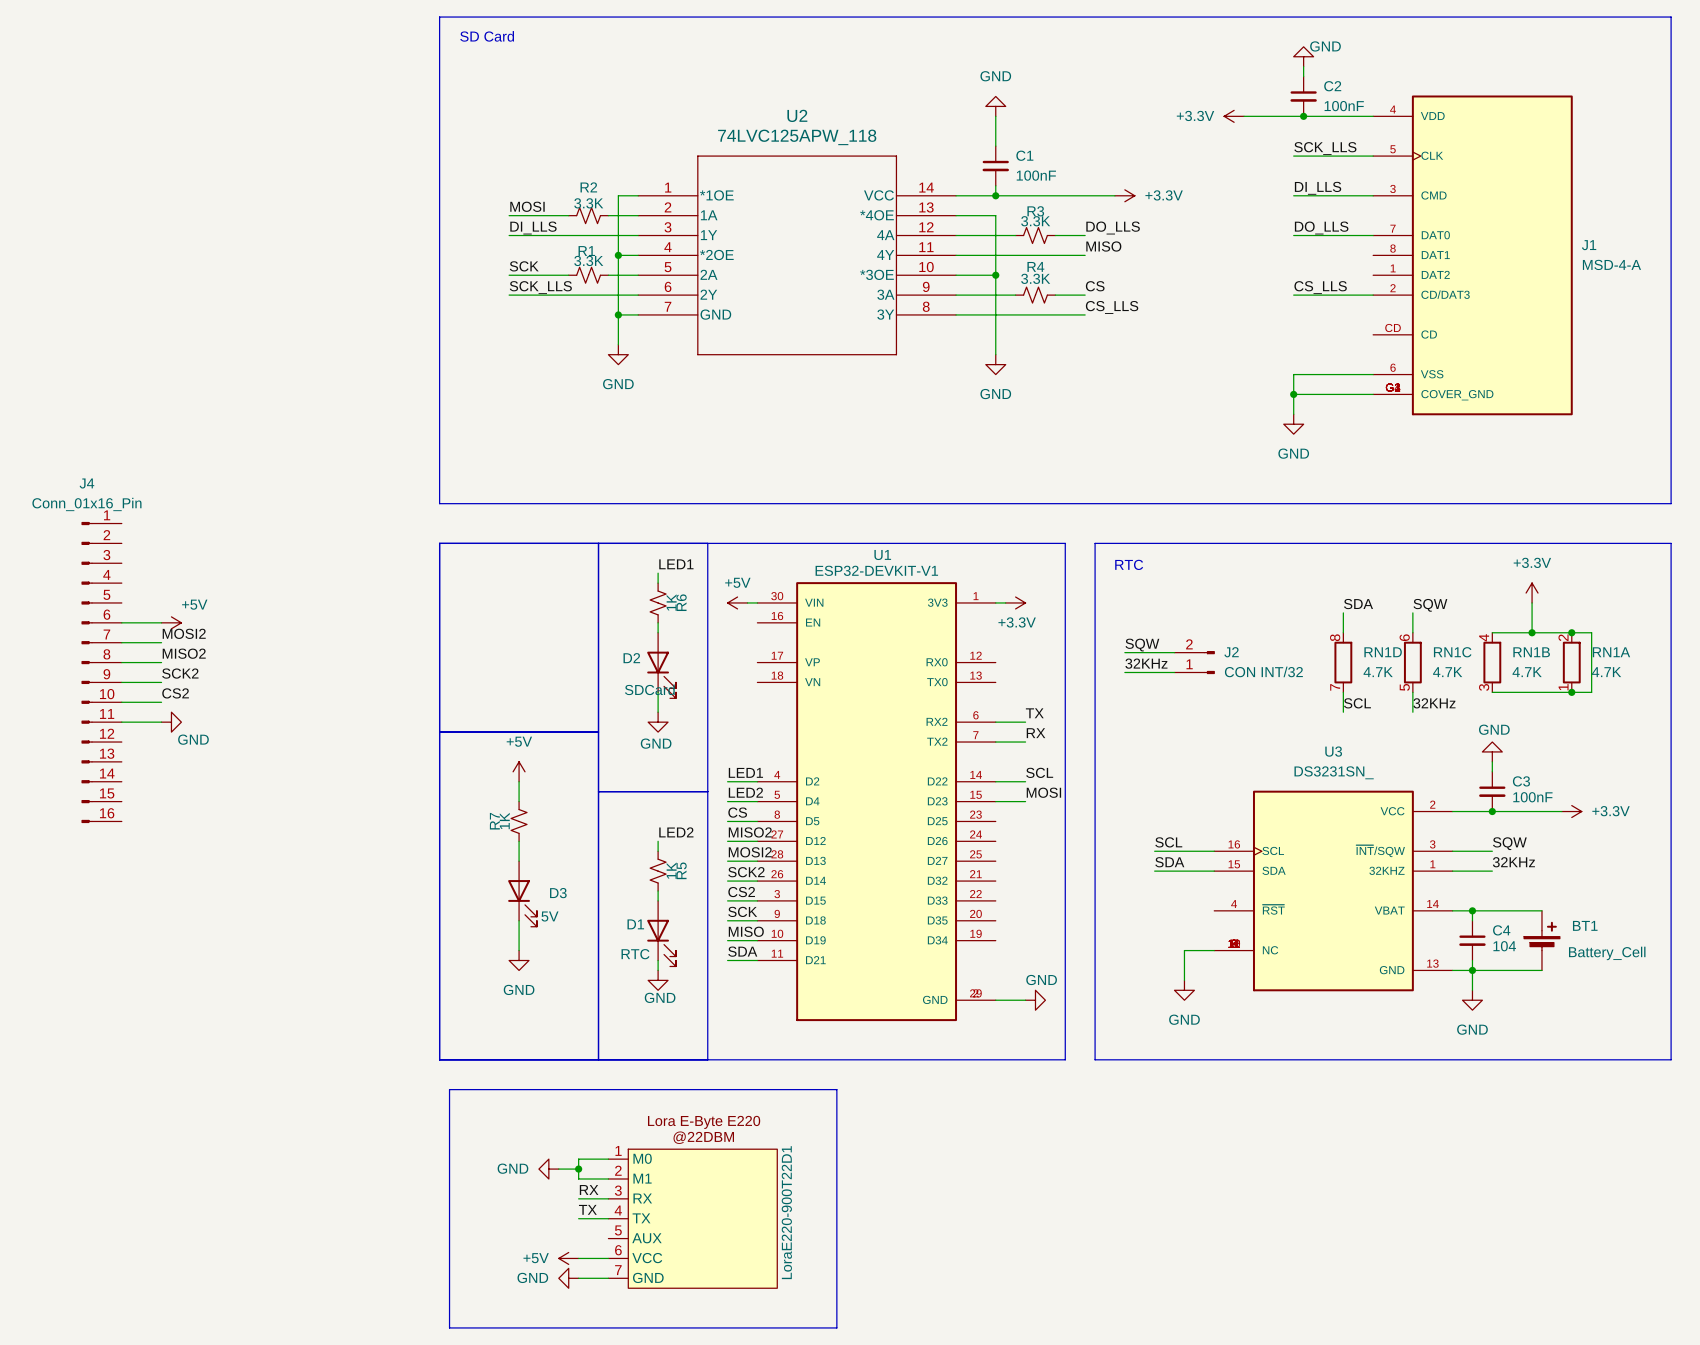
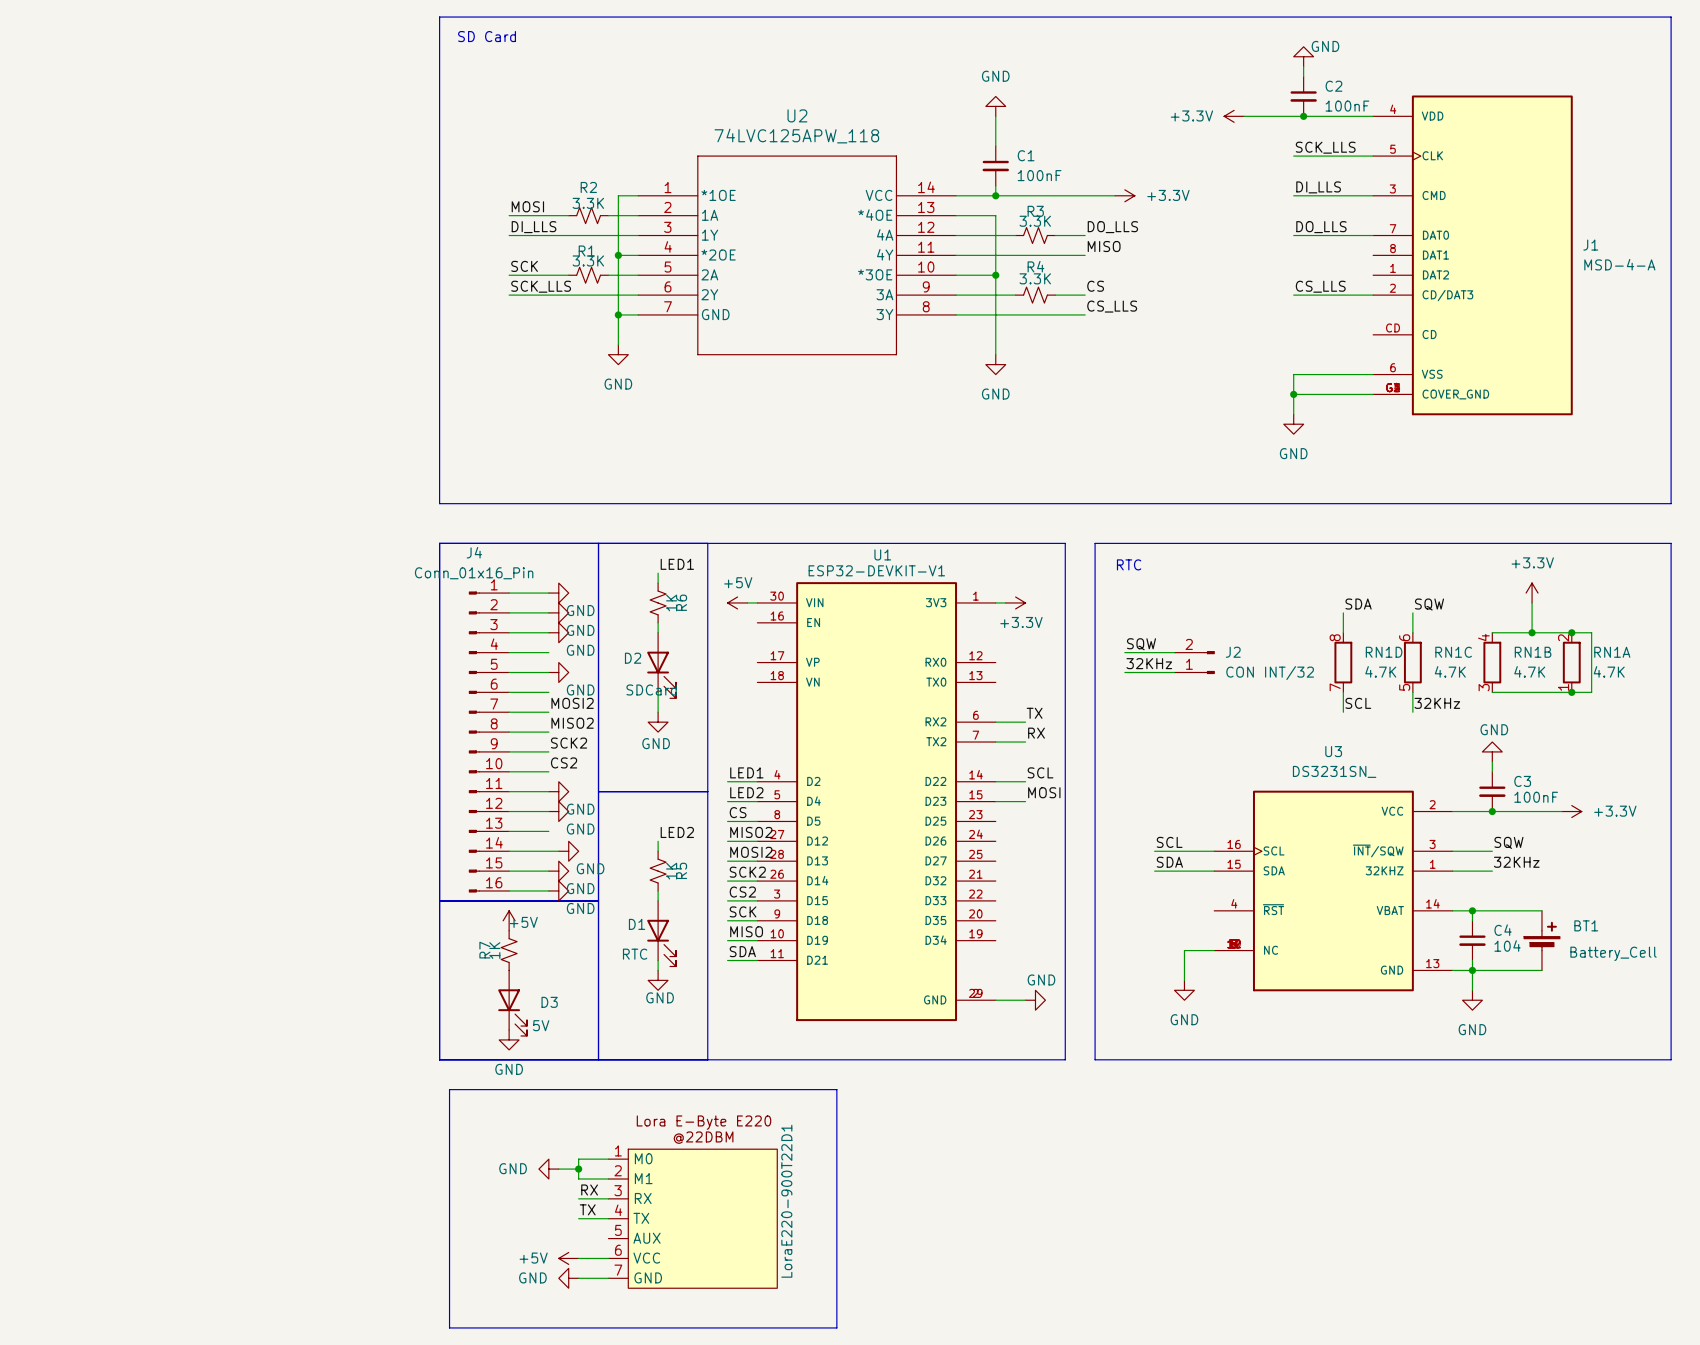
wire: none -> (509, 593) (548, 593)
power symbol: none -> GND (558, 593)
wire: none -> (509, 612) (548, 612)
power symbol: none -> GND (558, 612)
wire: (121, 622) (161, 622) -> none
power symbol: +5V (171, 622) -> none
wire: none -> (509, 632) (548, 632)
power symbol: none -> GND (558, 632)
label: MOSI2 (184, 633) -> none
wire: (121, 642) (161, 642) -> none
wire: none -> (509, 652) (548, 652)
label: MISO2 (184, 653) -> none
wire: (121, 662) (161, 662) -> none
J4 position: (101, 672) -> (488, 742)
wire: none -> (509, 672) (548, 672)
power symbol: none -> GND (558, 672)
label: SCK2 (180, 673) -> none
wire: (121, 682) (161, 682) -> none
wire: none -> (509, 692) (548, 692)
label: CS2 (175, 693) -> none
wire: (121, 702) (161, 702) -> none
label: none -> MOSI2 (572, 703)
wire: none -> (509, 712) (548, 712)
wire: (121, 722) (161, 722) -> none
power symbol: GND (171, 722) -> none
label: none -> MISO2 (572, 723)
line: (439, 732) (598, 732) -> (439, 900) (598, 900)
power symbol text position: +5V (519, 741) -> +5V (523, 922)
label: none -> SCK2 (569, 743)
wire: none -> (509, 751) (548, 751)
label: none -> CS2 (564, 762)
wire: none -> (509, 771) (548, 771)
power symbol position: +5V (519, 771) -> +5V (509, 920)
wire: (519, 781) (519, 801) -> none
wire: none -> (509, 791) (548, 791)
power symbol: none -> GND (558, 791)
wire: none -> (509, 811) (548, 811)
power symbol: none -> GND (558, 811)
R7 position: (519, 821) -> (509, 950)
wire: none -> (509, 831) (548, 831)
wire: (519, 841) (519, 861) -> none
wire: none -> (509, 851) (558, 851)
power symbol: none -> GND (568, 851)
wire: none -> (509, 871) (548, 871)
power symbol: none -> GND (558, 871)
wire: none -> (509, 890) (548, 890)
power symbol: none -> GND (558, 890)
D3 position: (522, 893) -> (512, 1003)
wire: (519, 920) (519, 950) -> none
power symbol: GND (519, 960) -> none
power symbol: none -> GND (509, 1039)

